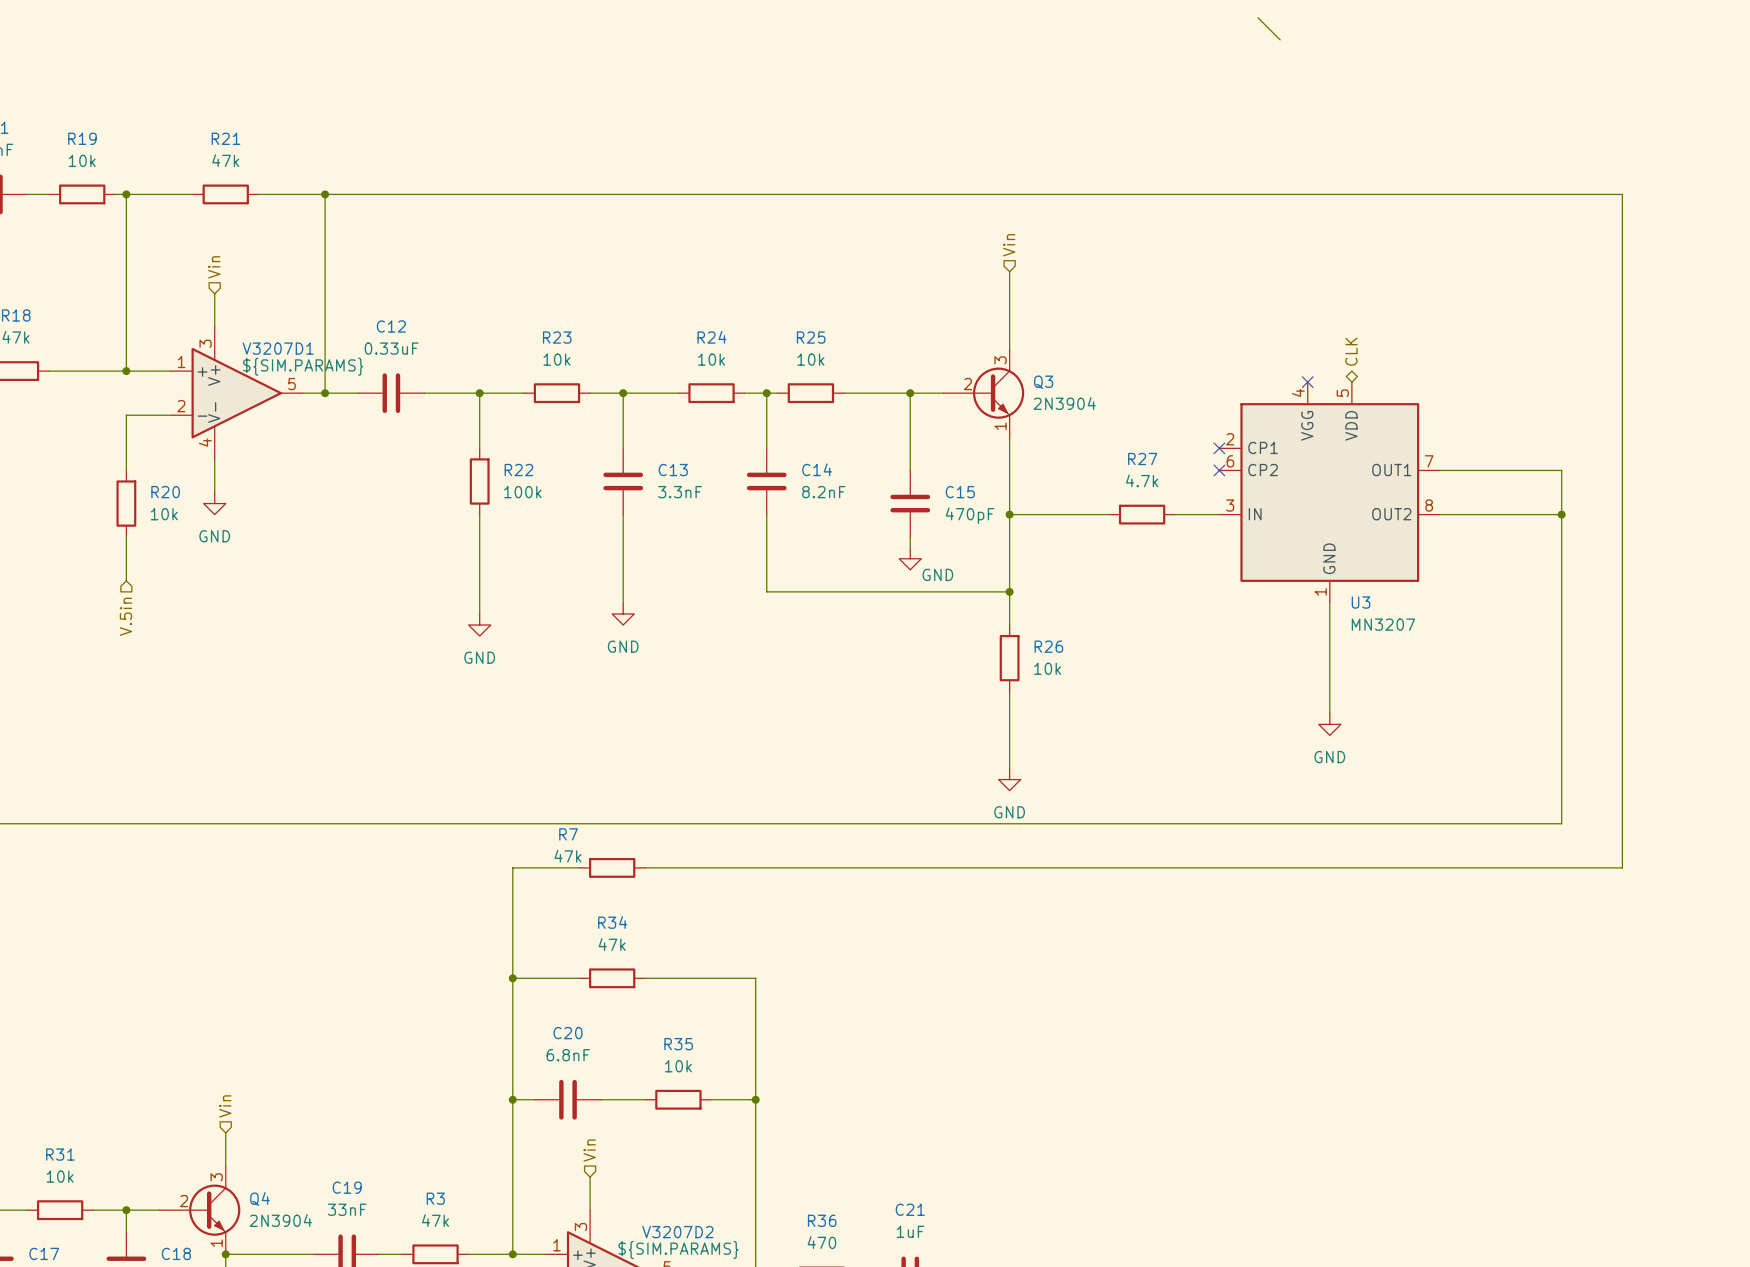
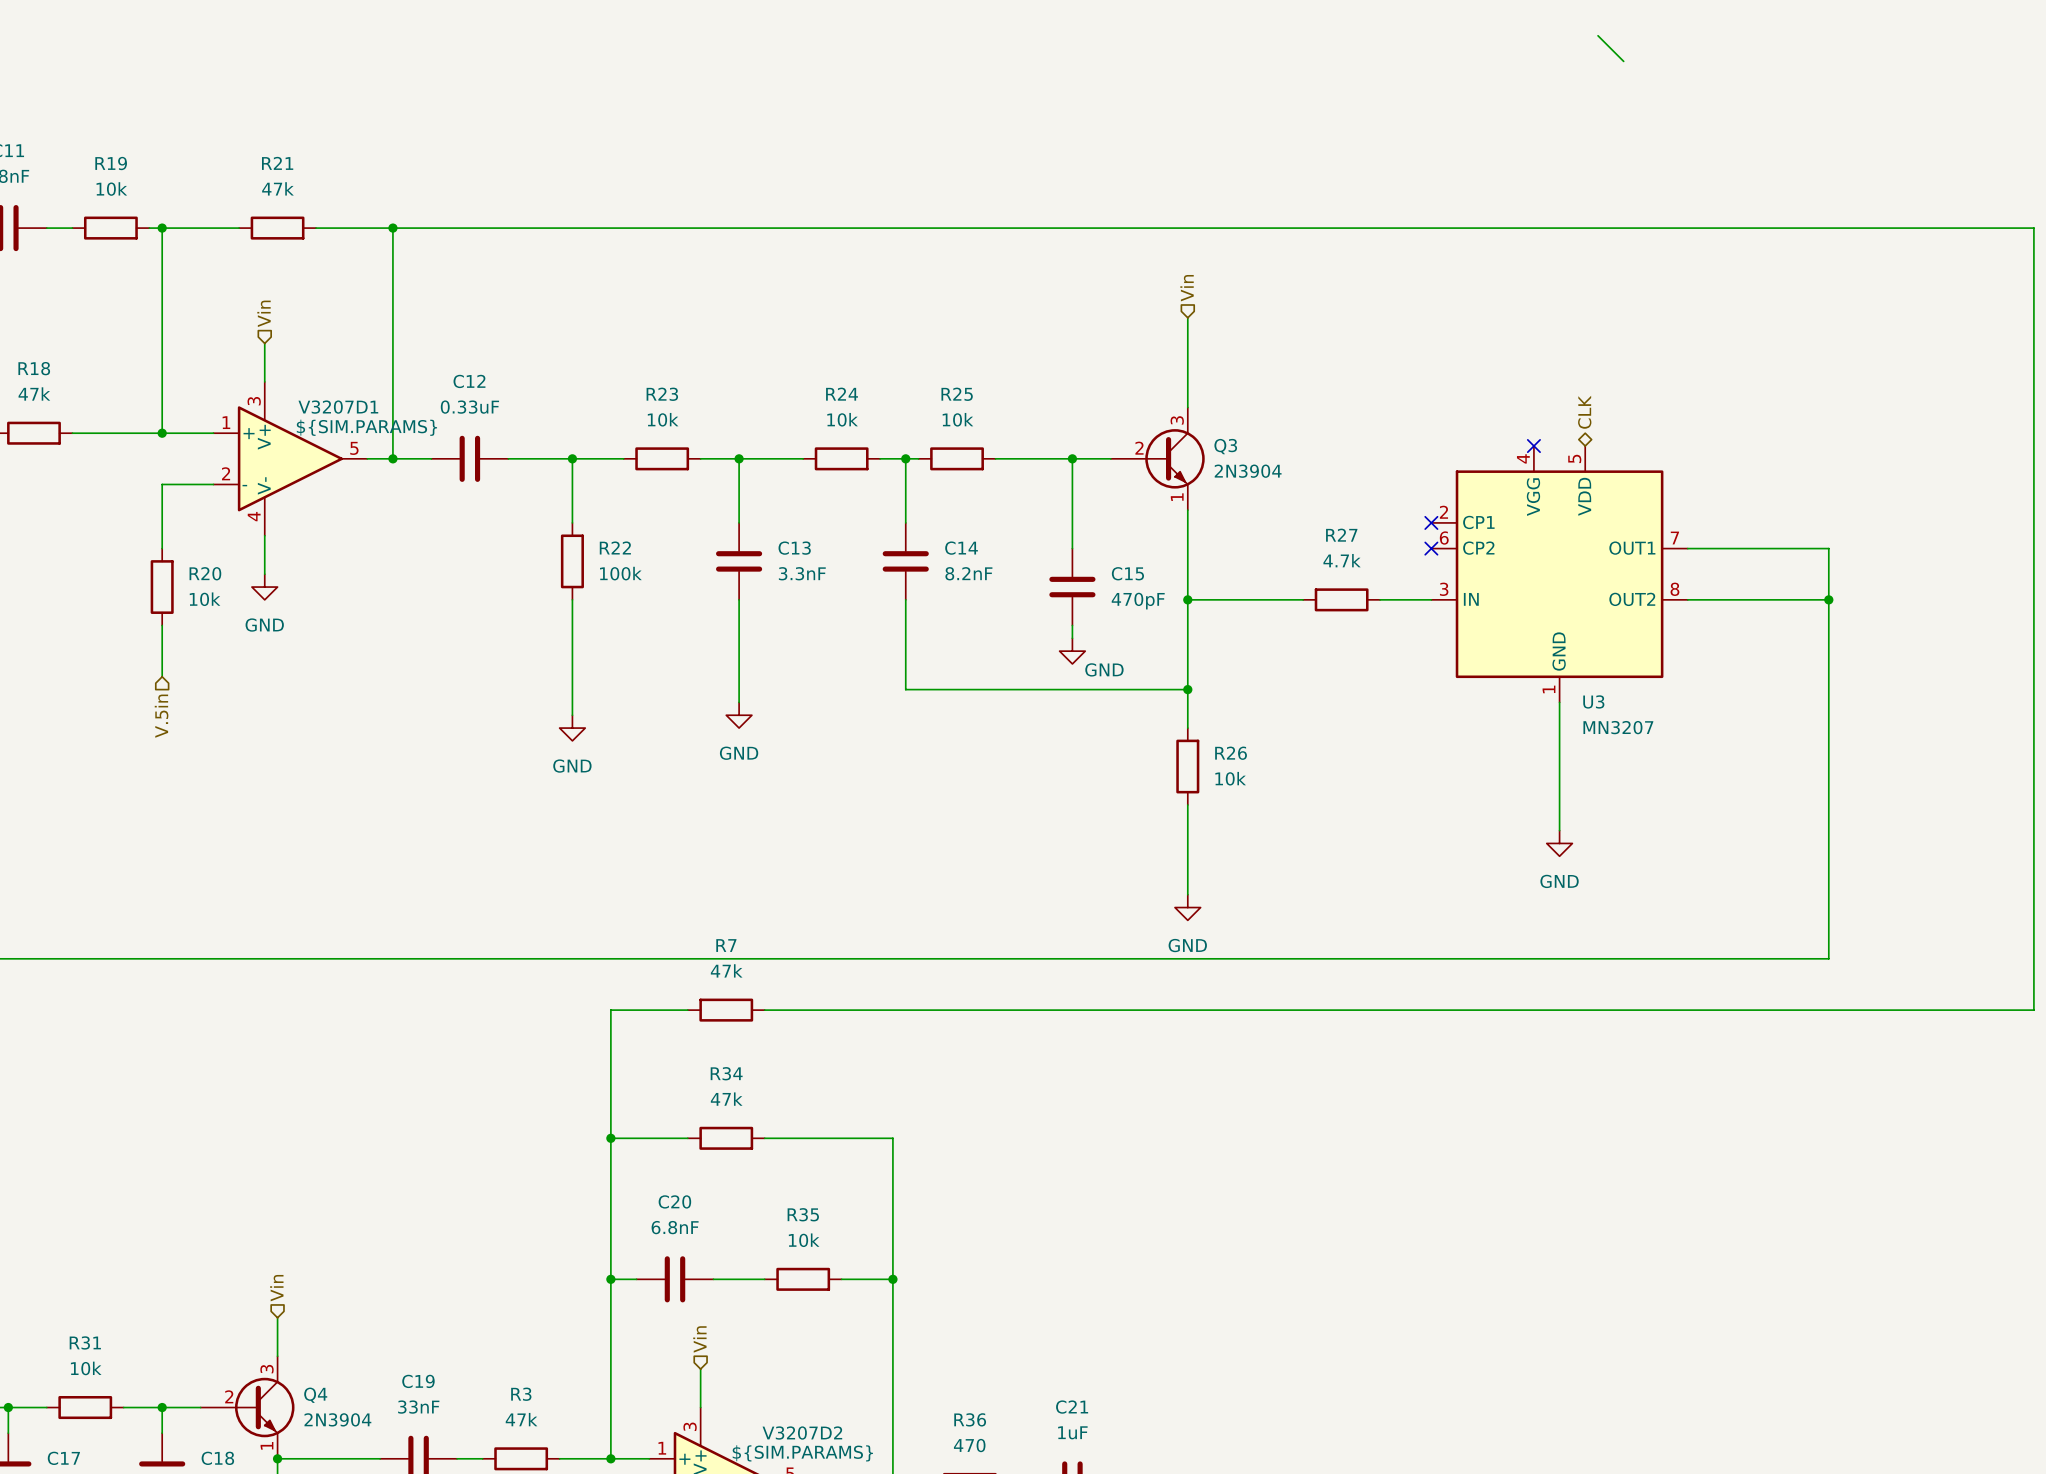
wire: (1258, 17) (1280, 39) -> (1598, 35) (1623, 61)
wire: (1622, 194) (1622, 867) -> (1899, 228) (2033, 228) (2033, 1010) (1899, 1010)
R7 name position: R7 (568, 834) -> R7 (726, 945)
R7 value position: 47k (568, 856) -> 47k (726, 970)

